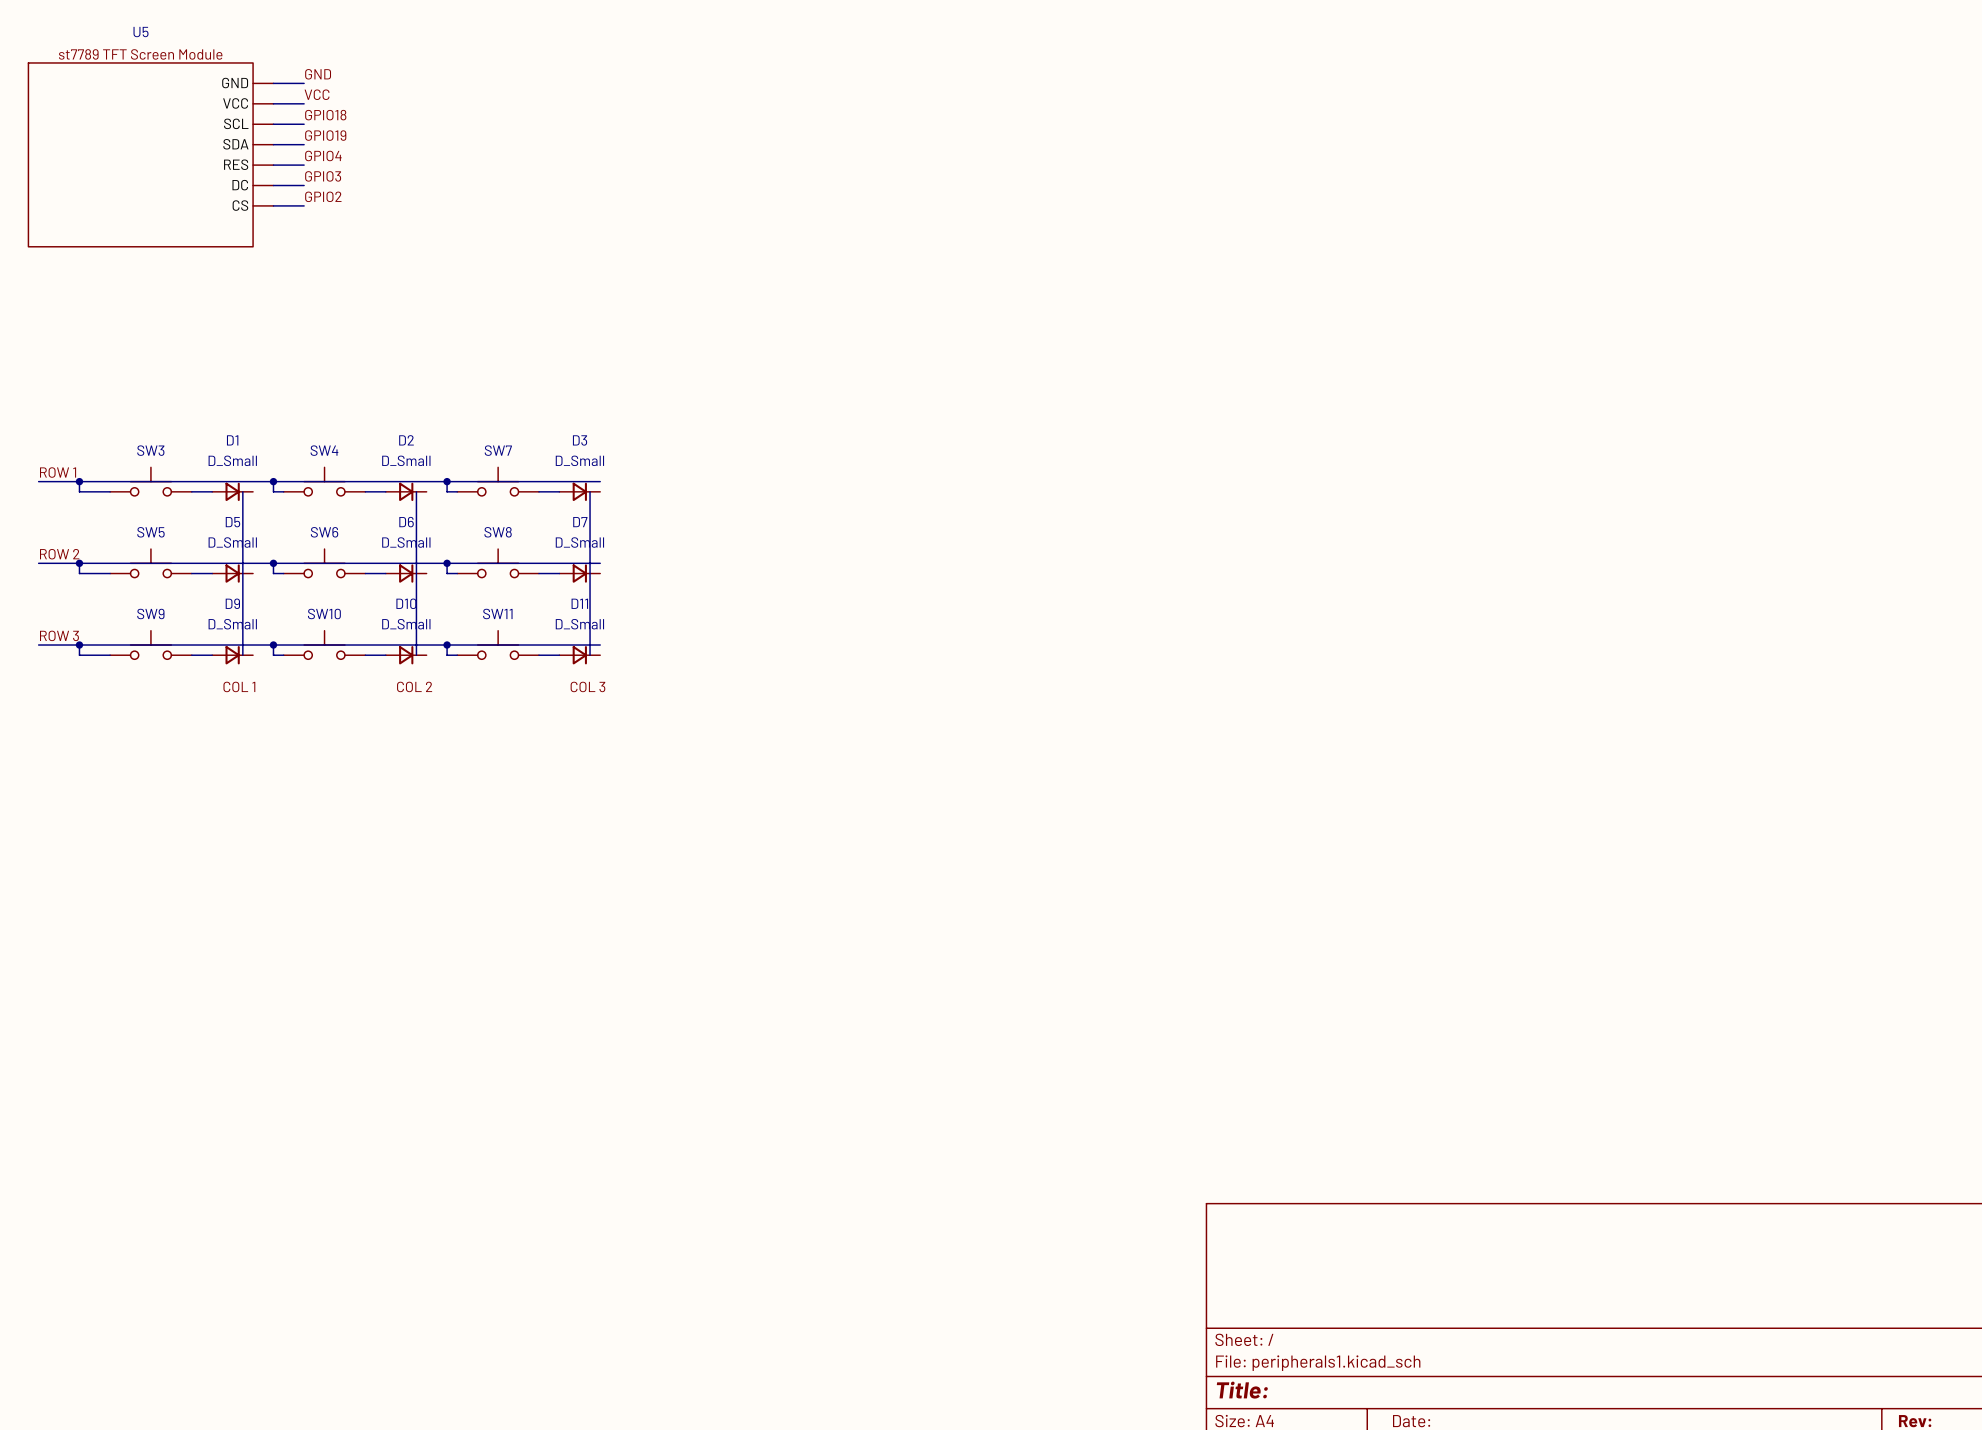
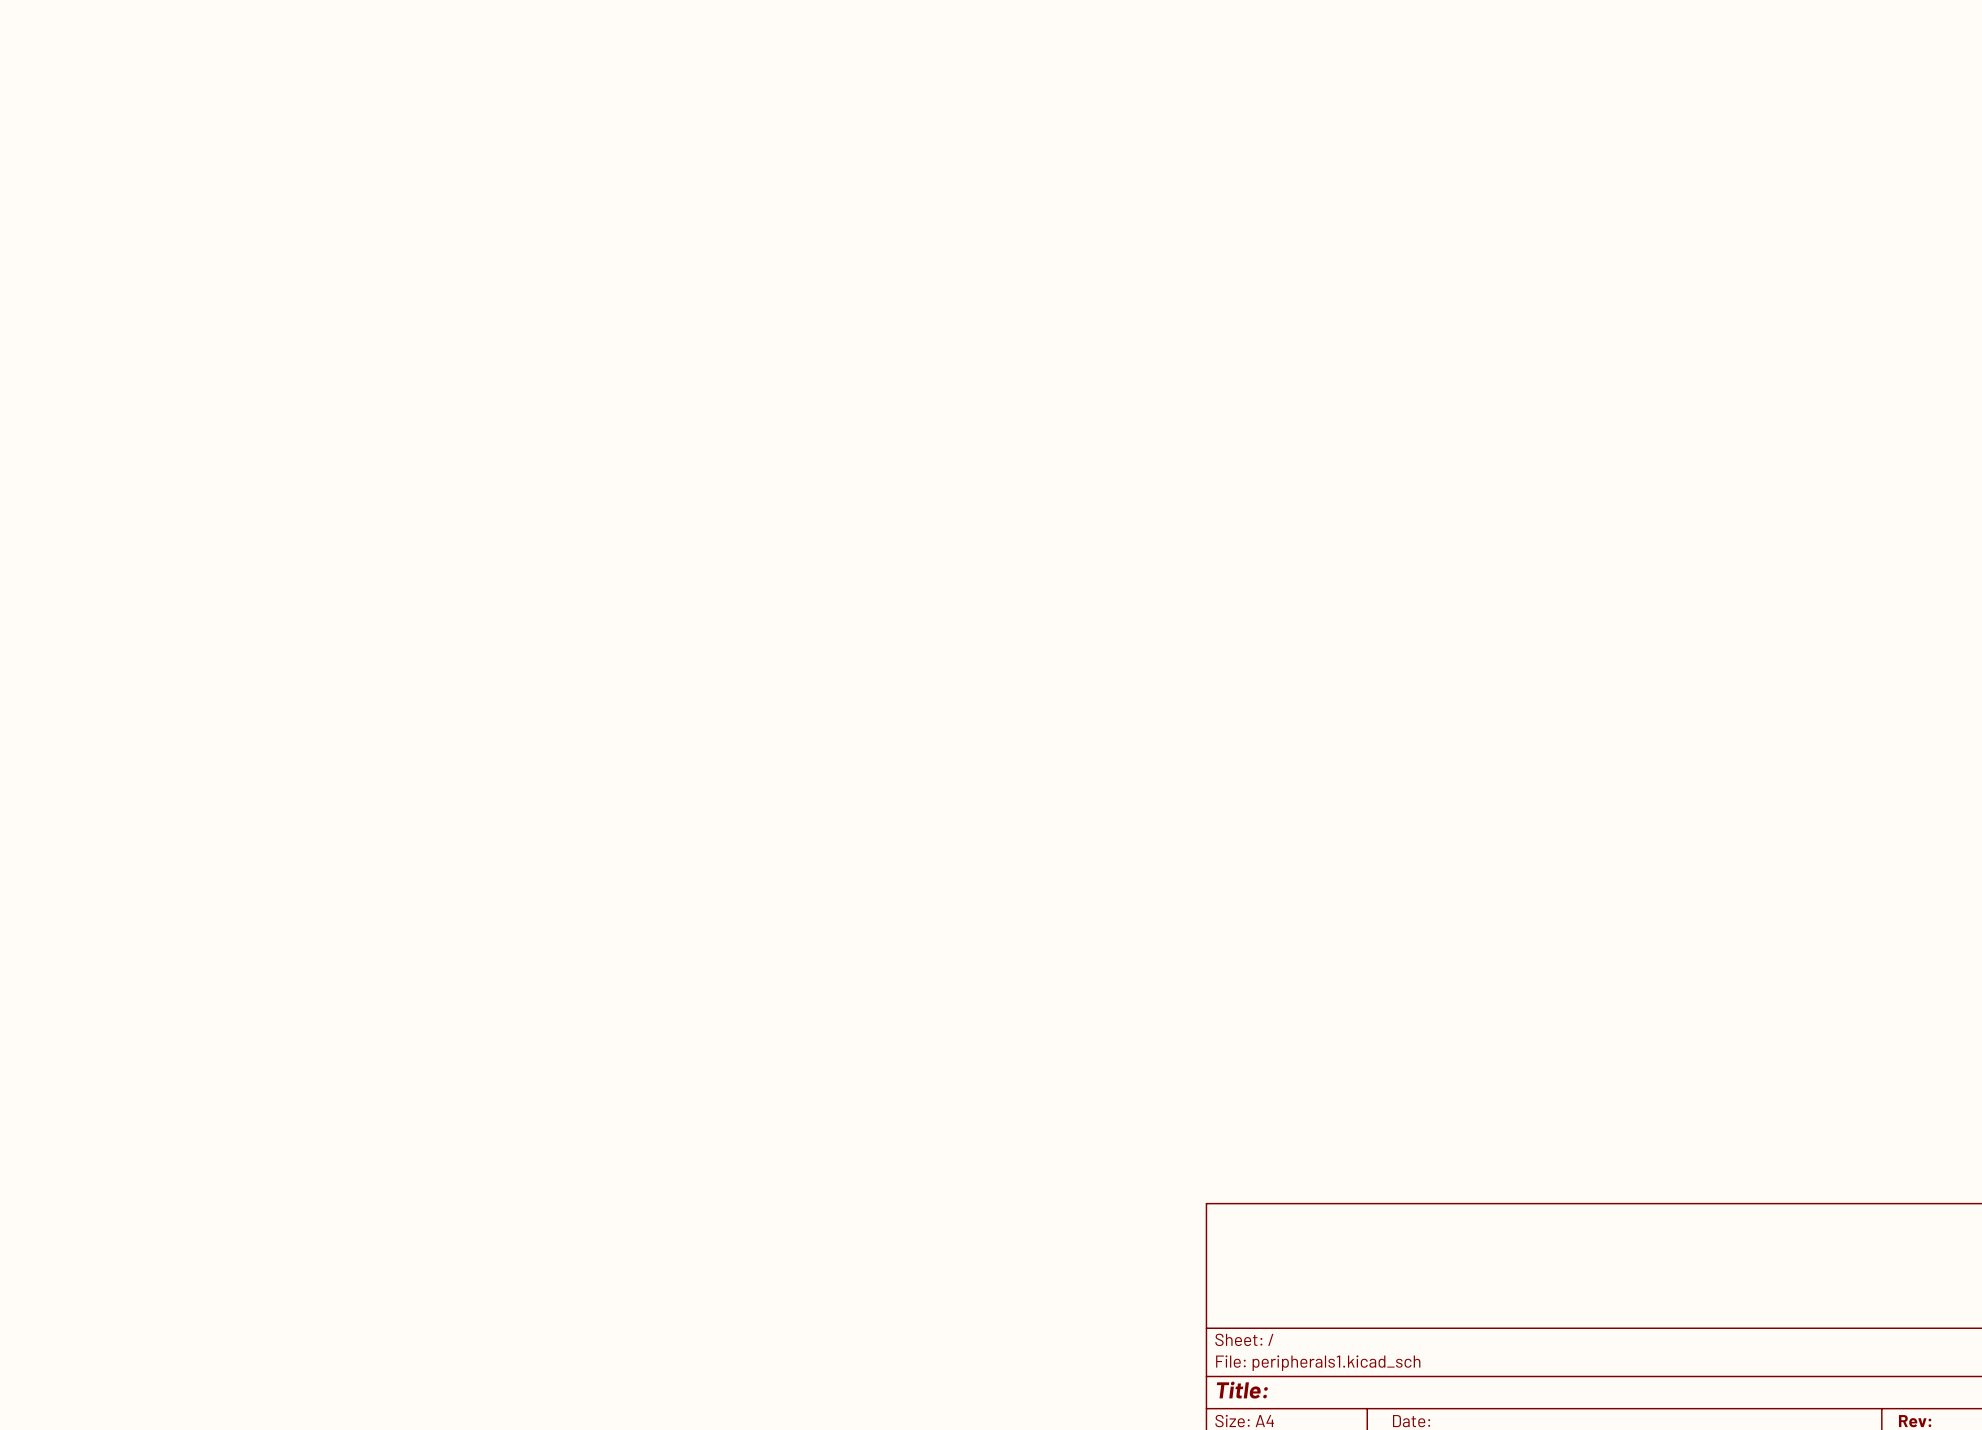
label: GND (318, 74) -> none
wire: (273, 83) (304, 83) -> none
label: VCC (317, 94) -> none
wire: (273, 103) (304, 103) -> none
label: GPIO18 (325, 115) -> none
wire: (273, 124) (304, 124) -> none
label: GPIO19 (325, 135) -> none
wire: (273, 144) (304, 144) -> none
U5: (150, 154) -> none
label: GPIO4 (323, 155) -> none
wire: (273, 165) (304, 165) -> none
label: GPIO3 (323, 176) -> none
wire: (273, 185) (304, 185) -> none
label: GPIO2 (323, 196) -> none
wire: (273, 205) (304, 205) -> none
label: ROW 1 (58, 472) -> none
wire: (38, 481) (600, 481) -> none
wire: (79, 481) (79, 491) (110, 491) -> none
junction: (79, 481) -> none
SW3: (150, 481) -> none
wire: (273, 481) (273, 491) (283, 491) -> none
junction: (273, 481) -> none
SW4: (324, 481) -> none
wire: (447, 481) (447, 491) (457, 491) -> none
junction: (447, 481) -> none
SW7: (498, 481) -> none
wire: (191, 491) (212, 491) -> none
D1: D_Small (232, 491) -> none
wire: (242, 491) (242, 655) -> none
wire: (365, 491) (385, 491) -> none
D2: D_Small (406, 491) -> none
wire: (416, 491) (416, 655) -> none
wire: (538, 491) (559, 491) -> none
D3: D_Small (579, 491) -> none
wire: (590, 491) (590, 655) -> none
label: ROW 2 (59, 554) -> none
wire: (38, 563) (600, 563) -> none
wire: (79, 563) (79, 573) (110, 573) -> none
junction: (79, 563) -> none
SW5: (150, 563) -> none
wire: (273, 563) (273, 573) (283, 573) -> none
junction: (273, 563) -> none
SW6: (324, 563) -> none
wire: (447, 563) (447, 573) (457, 573) -> none
junction: (447, 563) -> none
SW8: (498, 563) -> none
wire: (191, 573) (212, 573) -> none
D5: D_Small (232, 573) -> none
wire: (365, 573) (385, 573) -> none
D6: D_Small (406, 573) -> none
wire: (538, 573) (559, 573) -> none
D7: D_Small (579, 573) -> none
label: ROW 3 (59, 635) -> none
wire: (38, 645) (600, 645) -> none
wire: (79, 645) (79, 655) (110, 655) -> none
junction: (79, 645) -> none
SW9: (150, 645) -> none
wire: (273, 645) (273, 655) (283, 655) -> none
junction: (273, 645) -> none
SW10: (324, 645) -> none
wire: (447, 645) (447, 655) (457, 655) -> none
junction: (447, 645) -> none
SW11: (498, 645) -> none
wire: (191, 655) (212, 655) -> none
D9: D_Small (232, 655) -> none
wire: (365, 655) (385, 655) -> none
D10: D_Small (406, 655) -> none
wire: (538, 655) (559, 655) -> none
D11: D_Small (579, 655) -> none
label: COL 1 (239, 686) -> none
label: COL 2 (414, 686) -> none
label: COL 3 (587, 686) -> none

